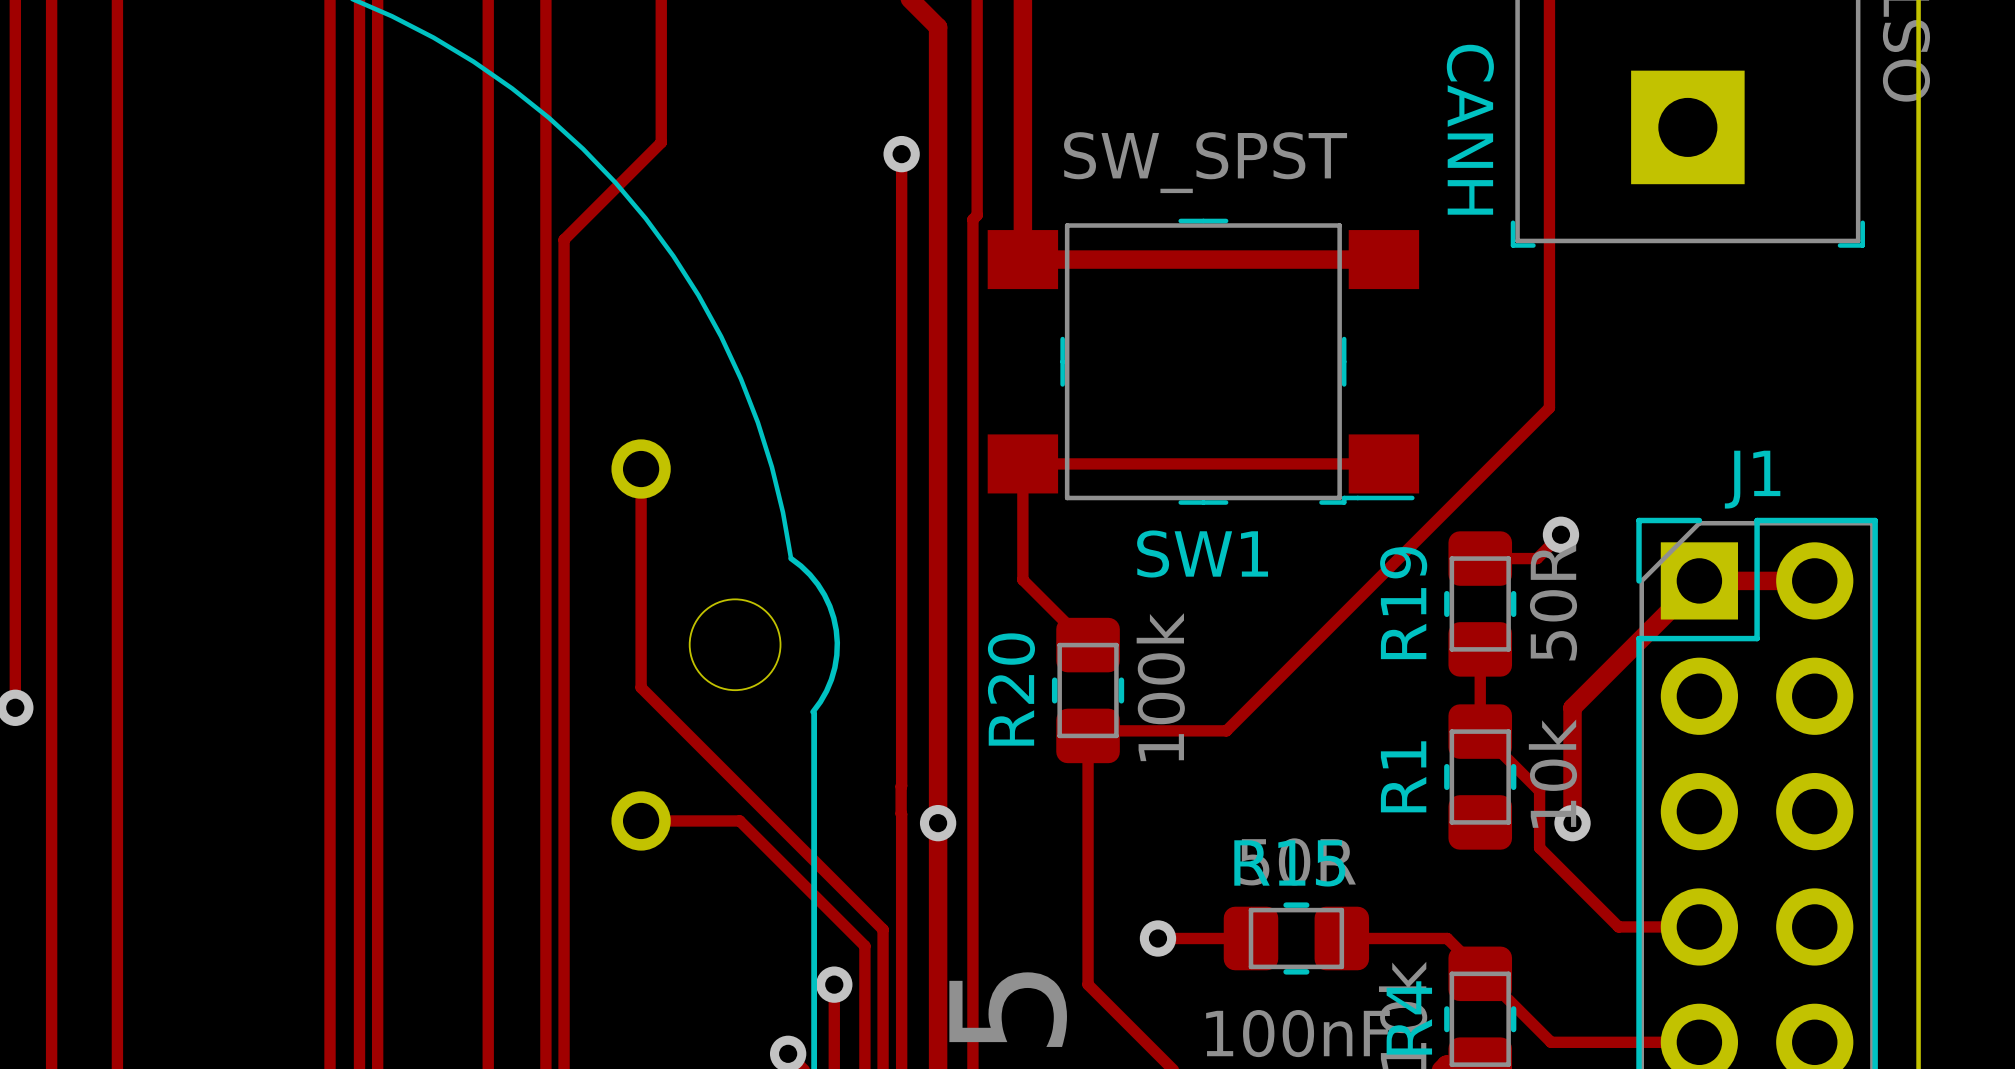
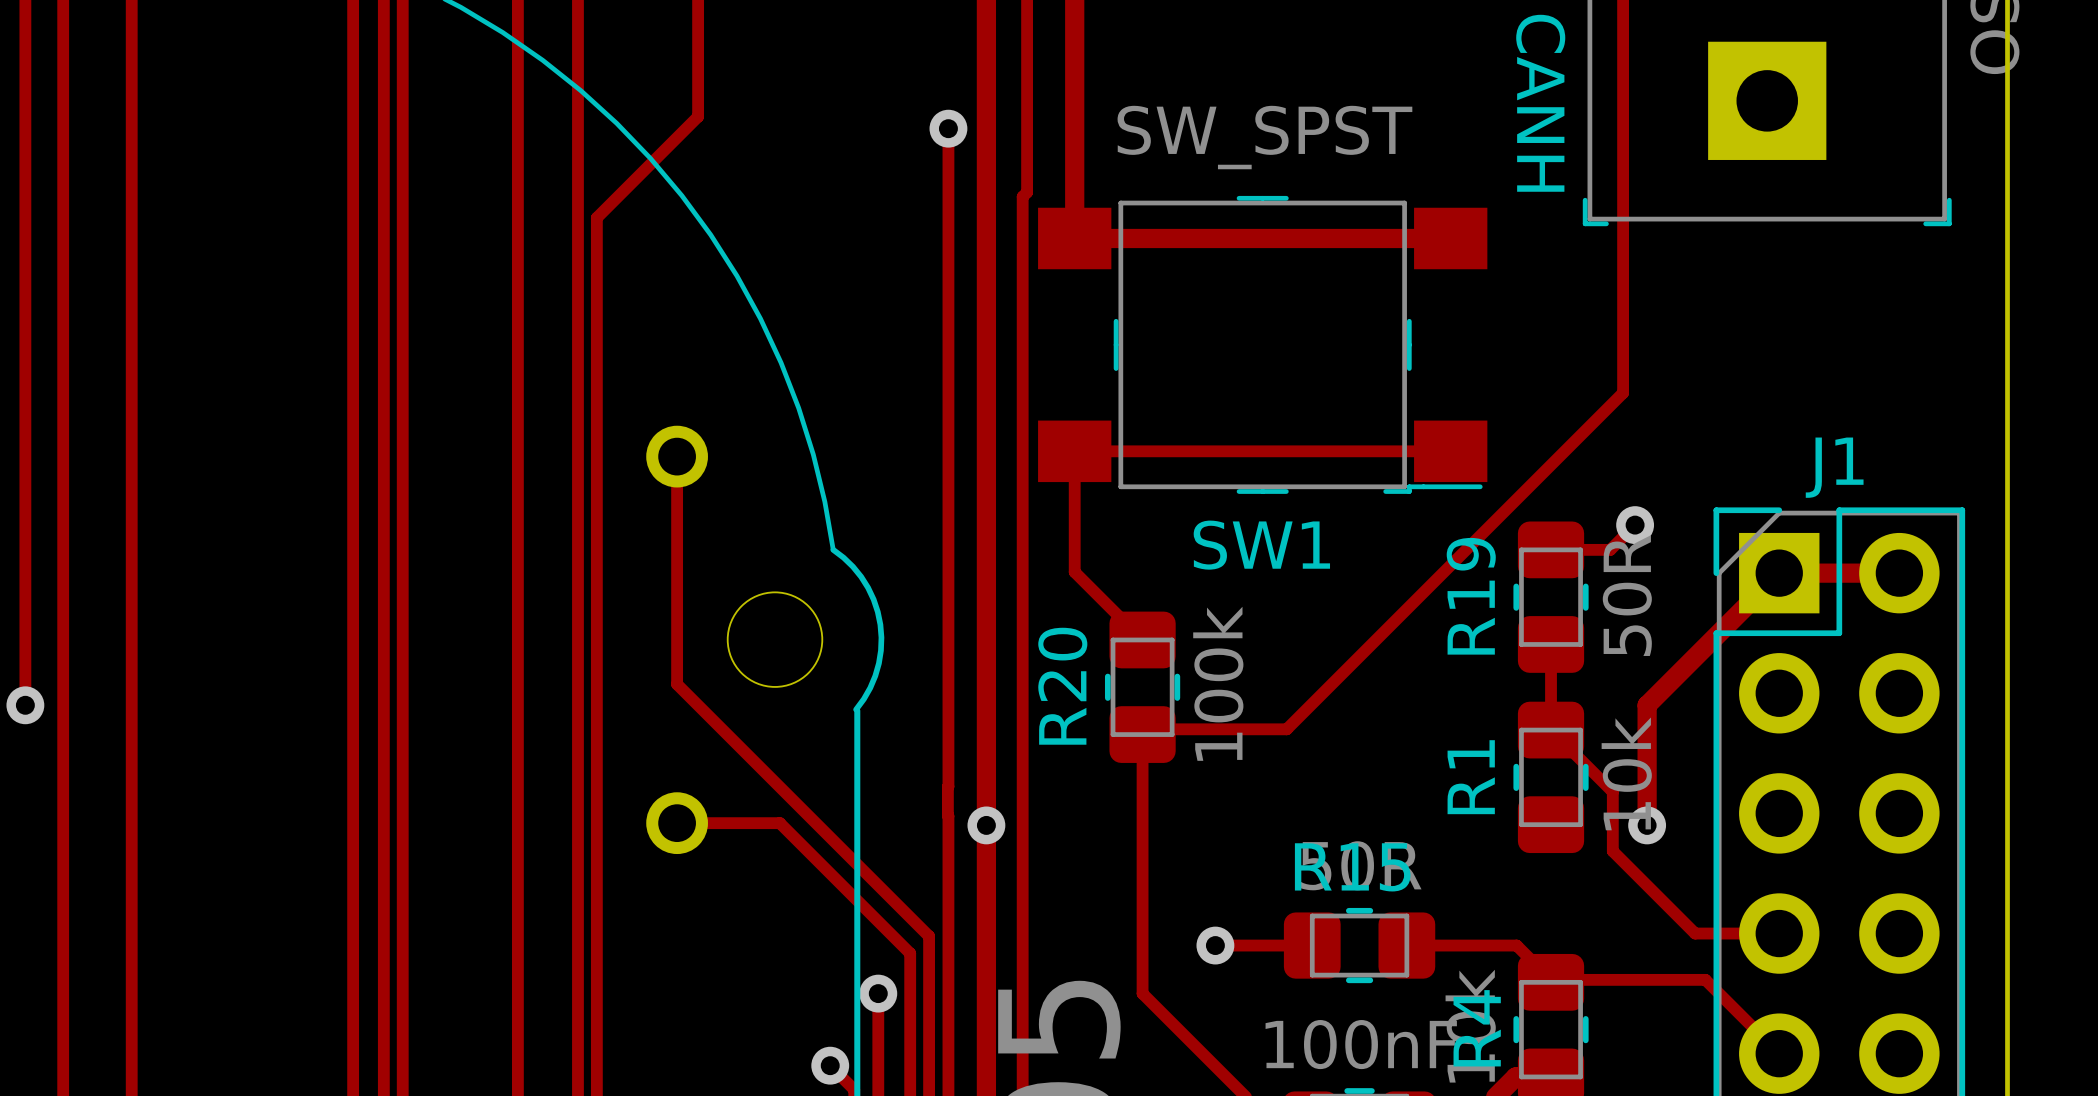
track: (1480, 971) (1551, 1042) (1699, 1042) -> (1551, 979) (1705, 979) (1779, 1053)

